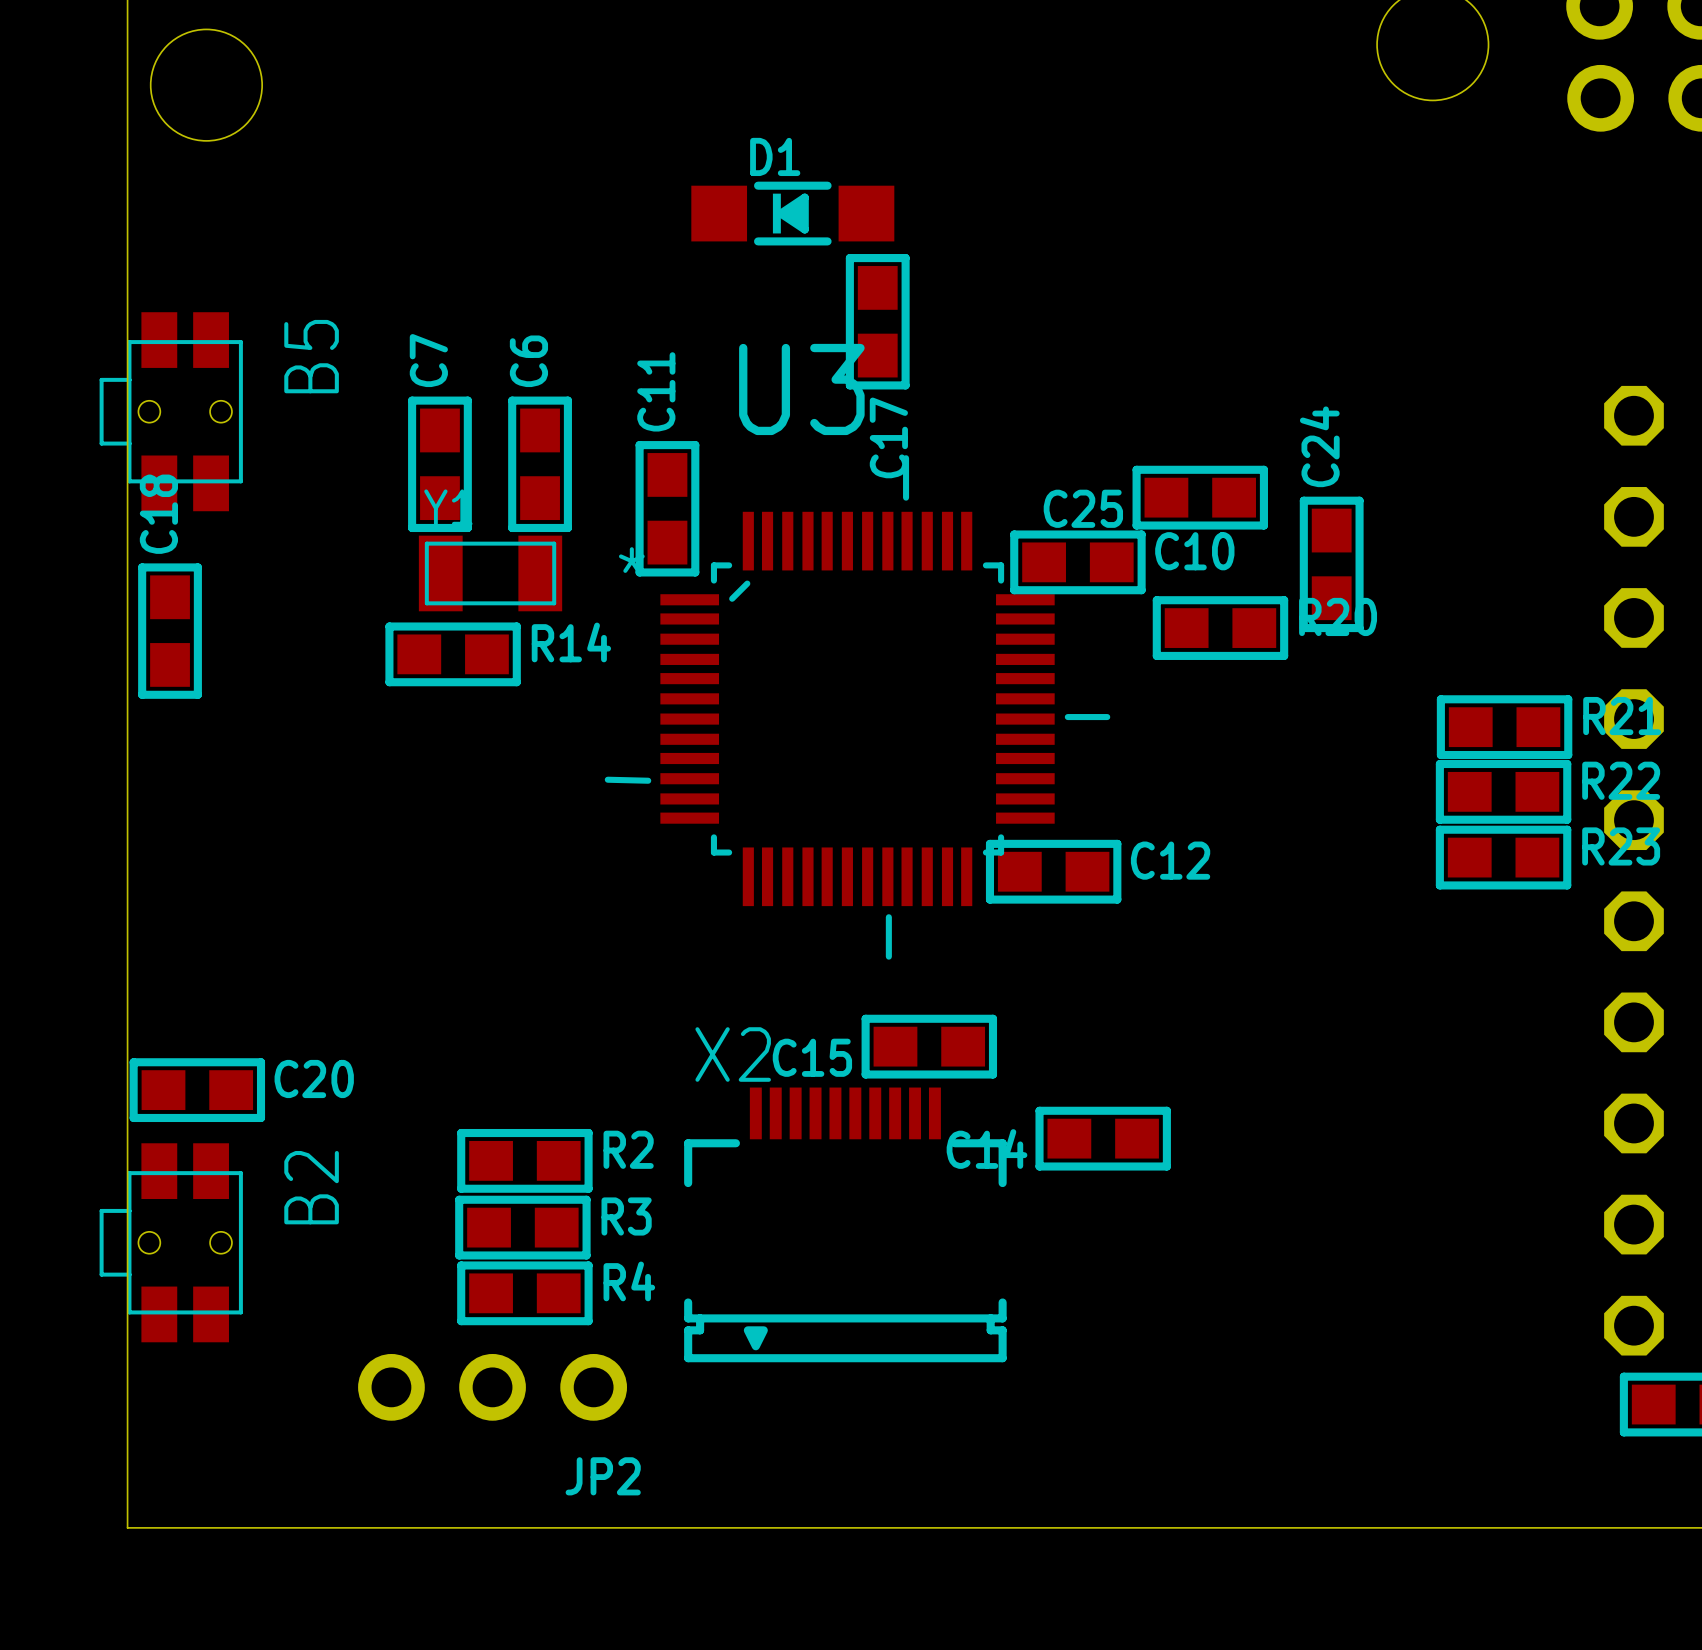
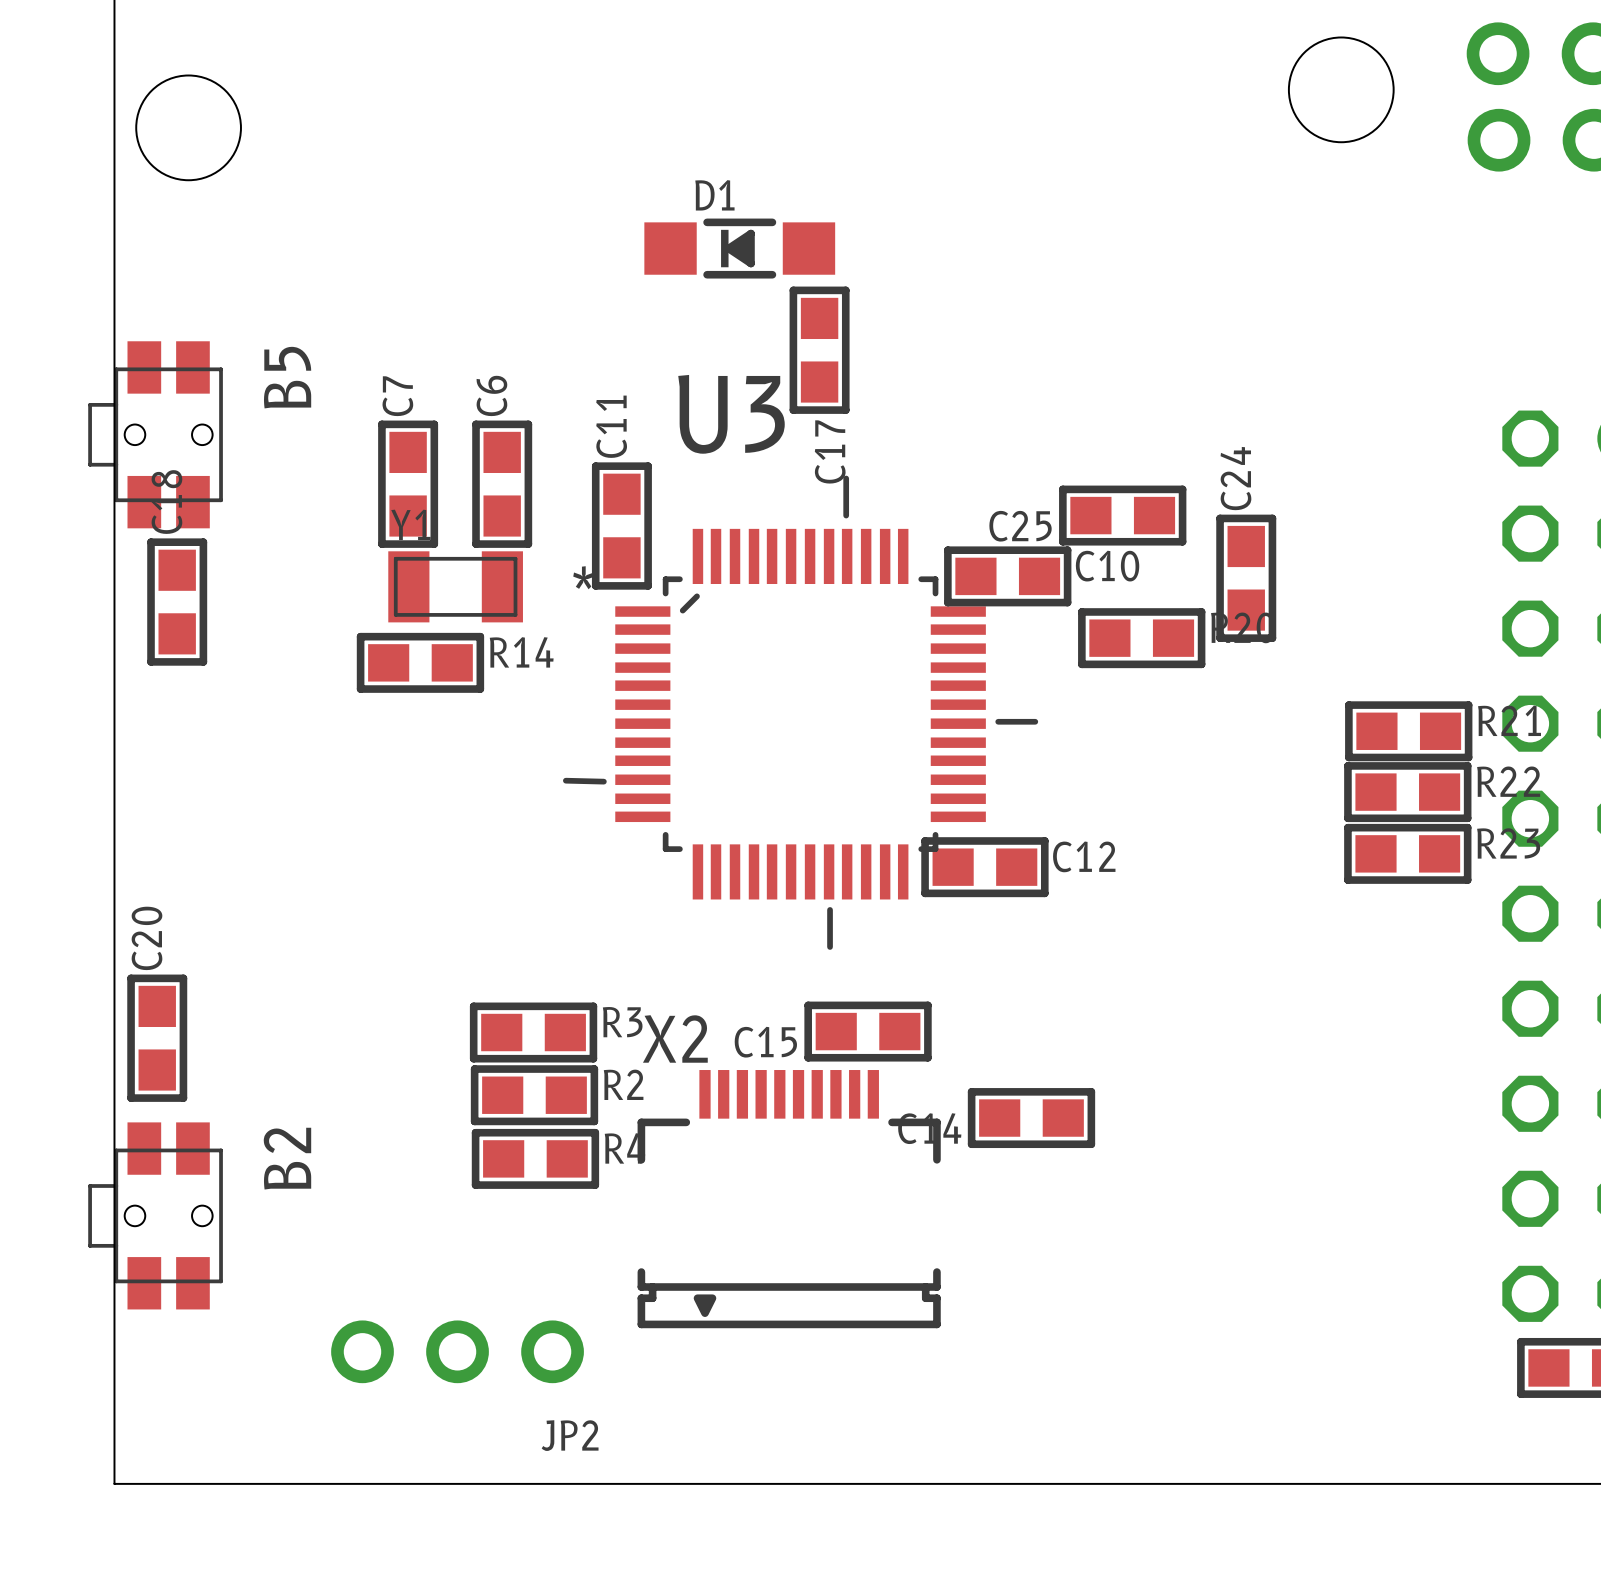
C18 position: (170, 631) -> (177, 602)
C20 name position: C20 (314, 1078) -> C20 (146, 938)
C20 rotation: 0° (197, 1090) -> 90° clockwise (157, 1038)
R2 position: (524, 1160) -> (534, 1095)
R3 position: (522, 1227) -> (533, 1032)
R4 position: (524, 1293) -> (535, 1158)

